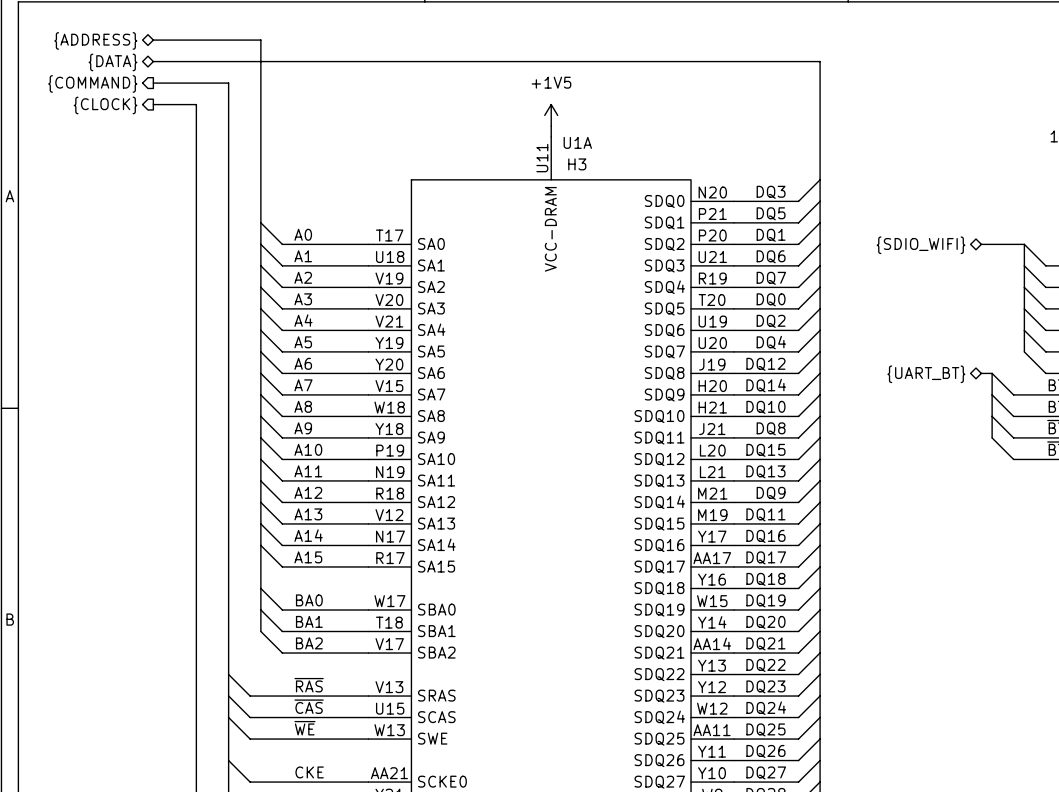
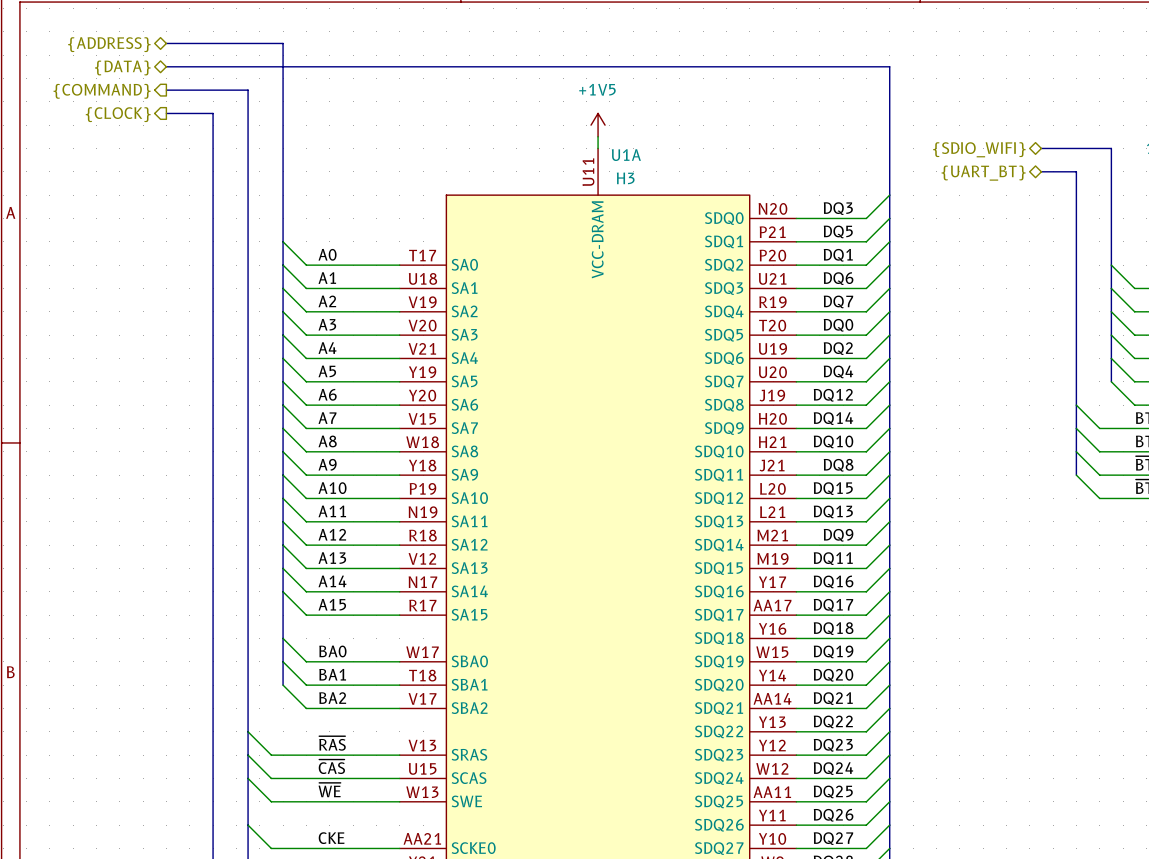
hierarchical label: none -> {UART_BT} (983, 173)
bus: (981, 244) (1024, 244) -> (1041, 148) (1111, 148) (1111, 265)
hierarchical label position: {SDIO_WIFI} (921, 245) -> {SDIO_WIFI} (979, 149)
bus: (981, 373) (992, 373) -> (1041, 171) (1076, 171) (1076, 405)
hierarchical label: {UART_BT} (926, 374) -> none

